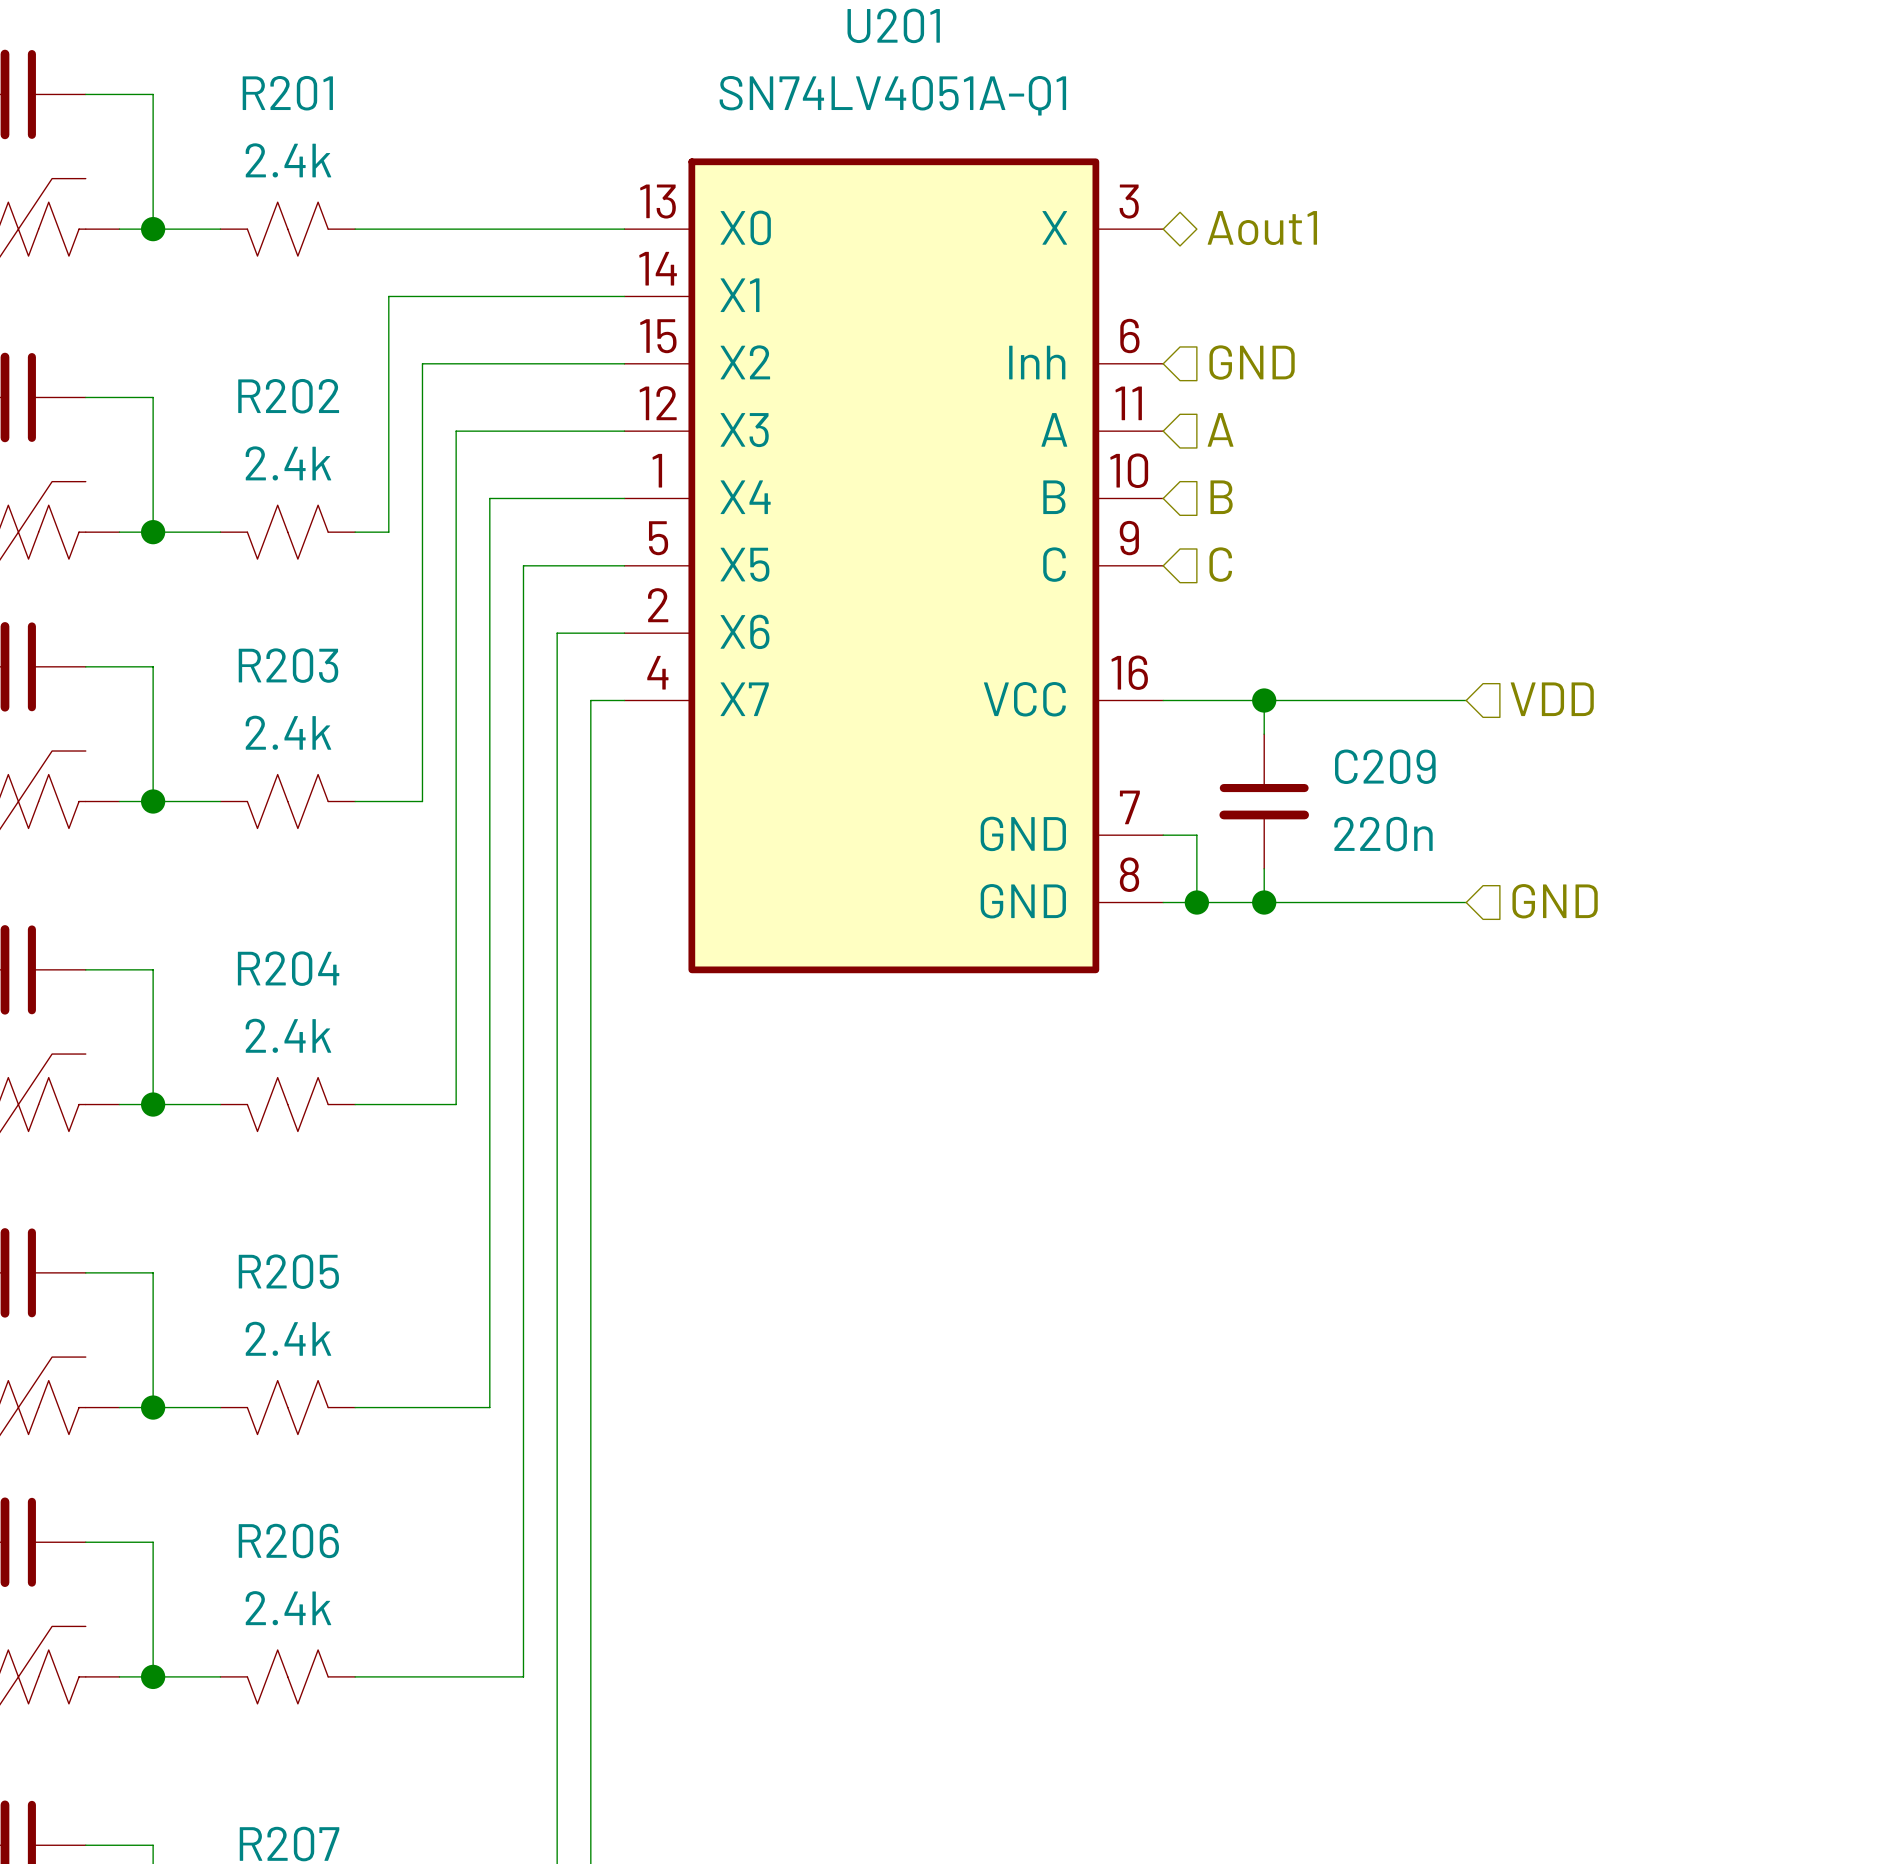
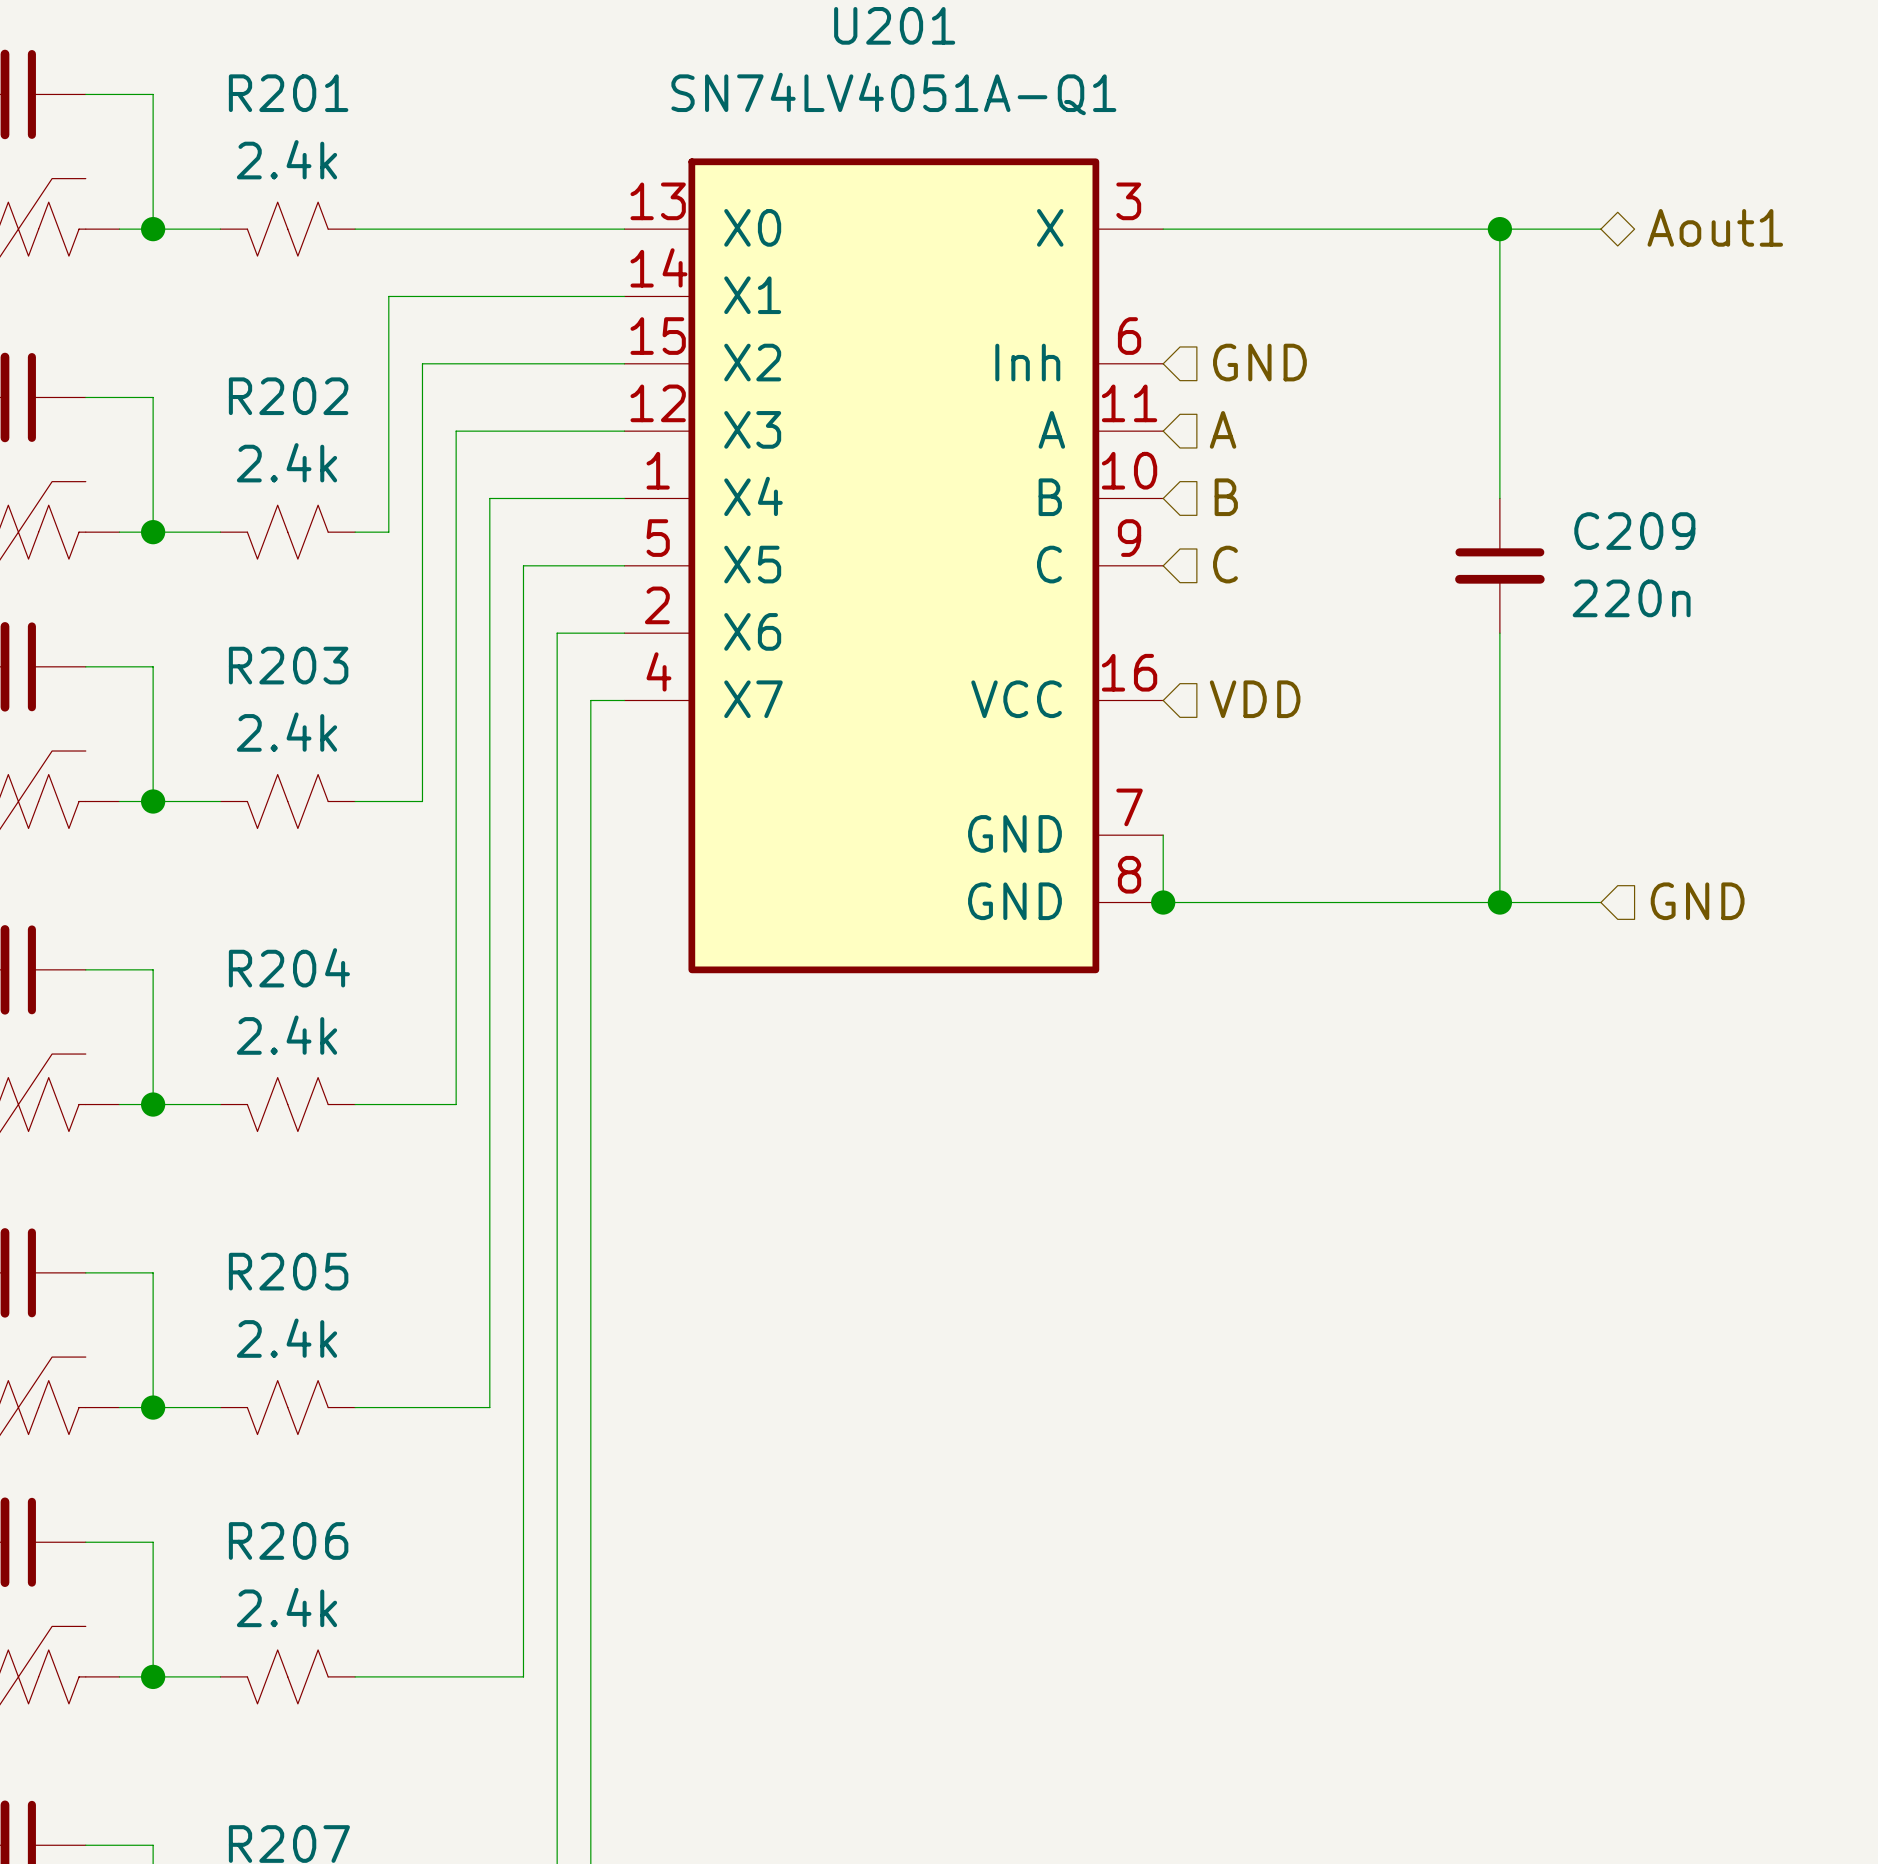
hierarchical label position: Aout1 (1262, 228) -> Aout1 (1715, 227)
wire: none -> (1163, 229) (1600, 229)
wire: none -> (1499, 229) (1499, 498)
junction: none -> (1499, 229)
wire: none -> (1499, 633) (1499, 902)
hierarchical label position: VDD (1552, 699) -> VDD (1255, 699)
wire: (1163, 700) (1466, 700) -> none
wire: (1264, 700) (1264, 734) -> none
junction: (1264, 700) -> none
C209 position: (1264, 801) -> (1499, 565)
wire: (1163, 835) (1196, 835) (1196, 902) -> (1163, 835) (1163, 902)
wire: (1264, 868) (1264, 902) -> none
hierarchical label position: GND (1555, 901) -> GND (1697, 901)
junction position: (1196, 902) -> (1163, 902)
junction: (1264, 902) -> none
wire: none -> (1466, 902) (1600, 902)
junction: none -> (1499, 902)

